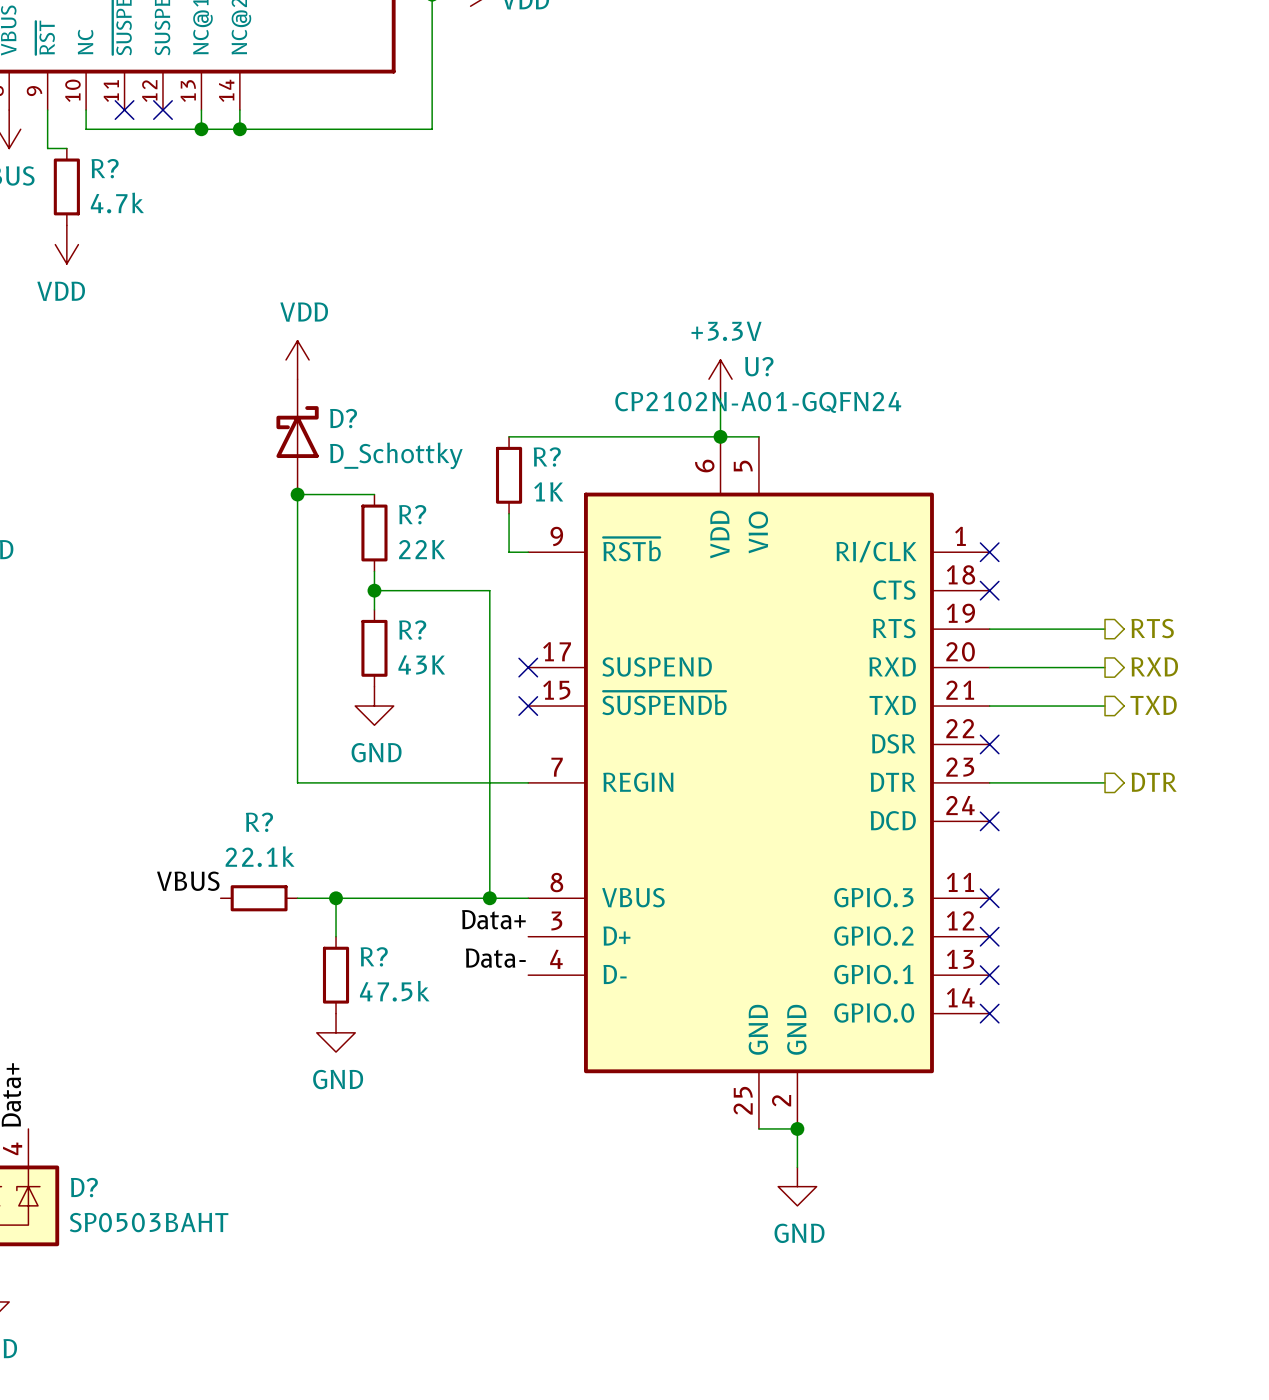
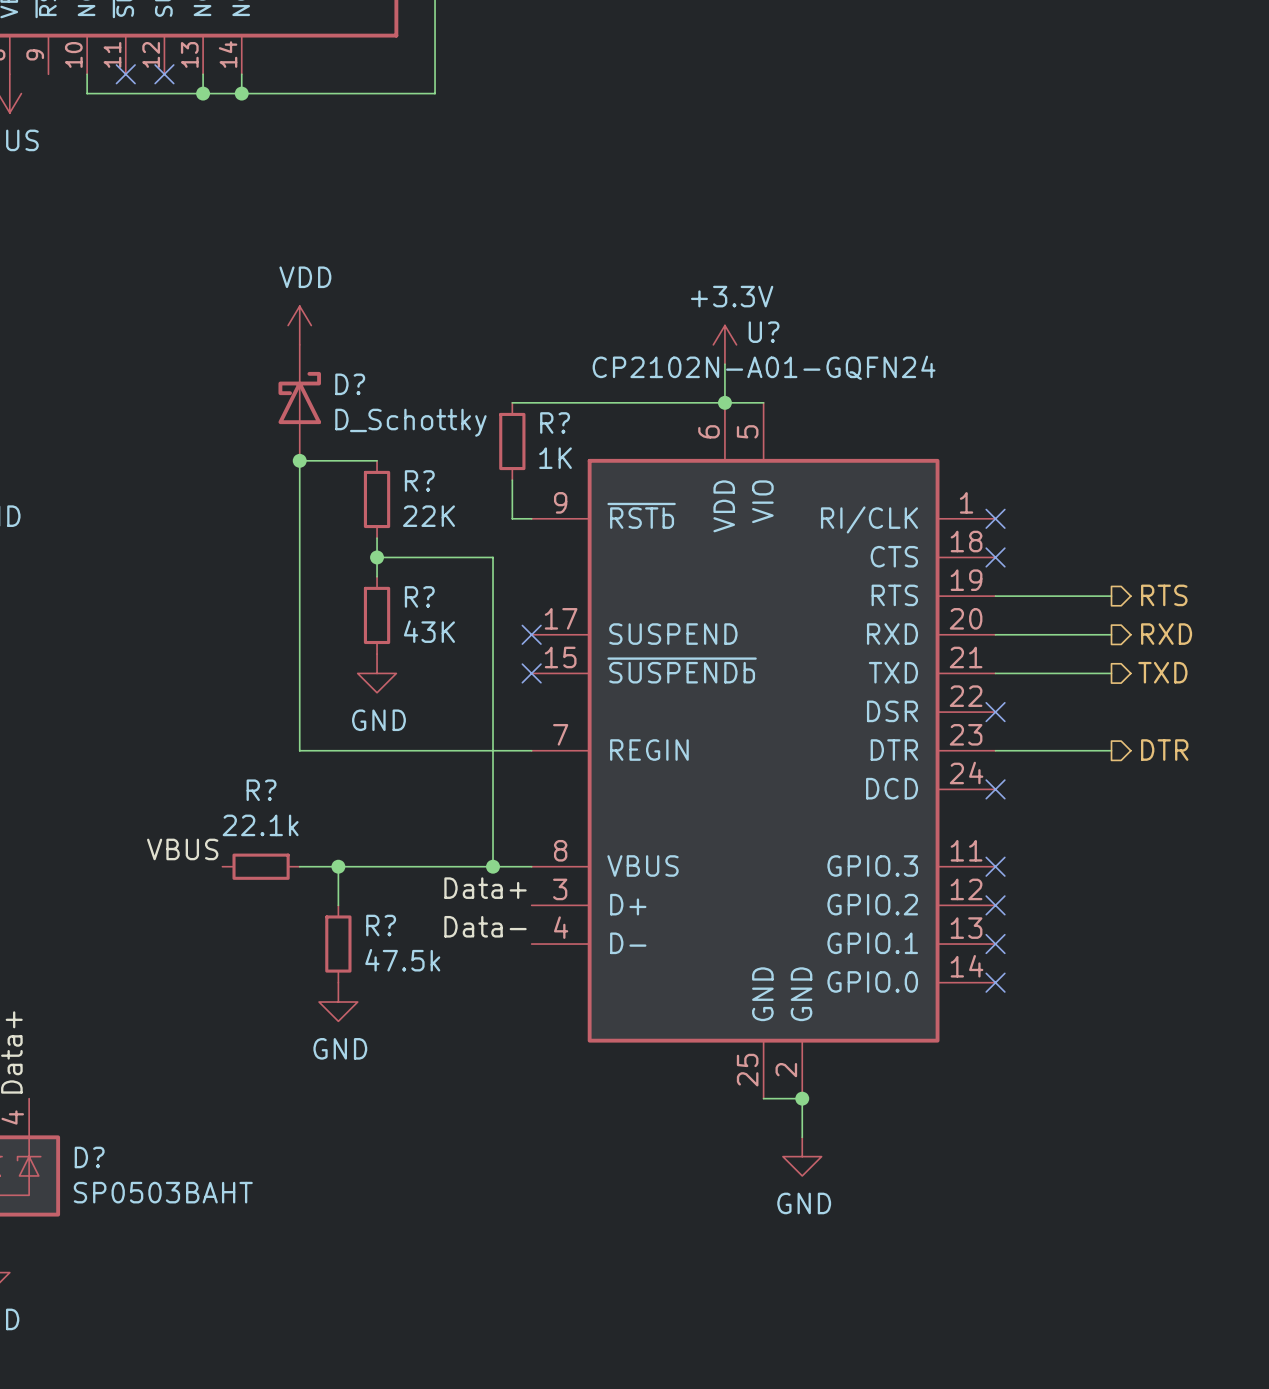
wire: (47, 110) (47, 148) (66, 148) -> none
R?: 4.7k (66, 186) -> none
power symbol: VDD (66, 244) -> none

